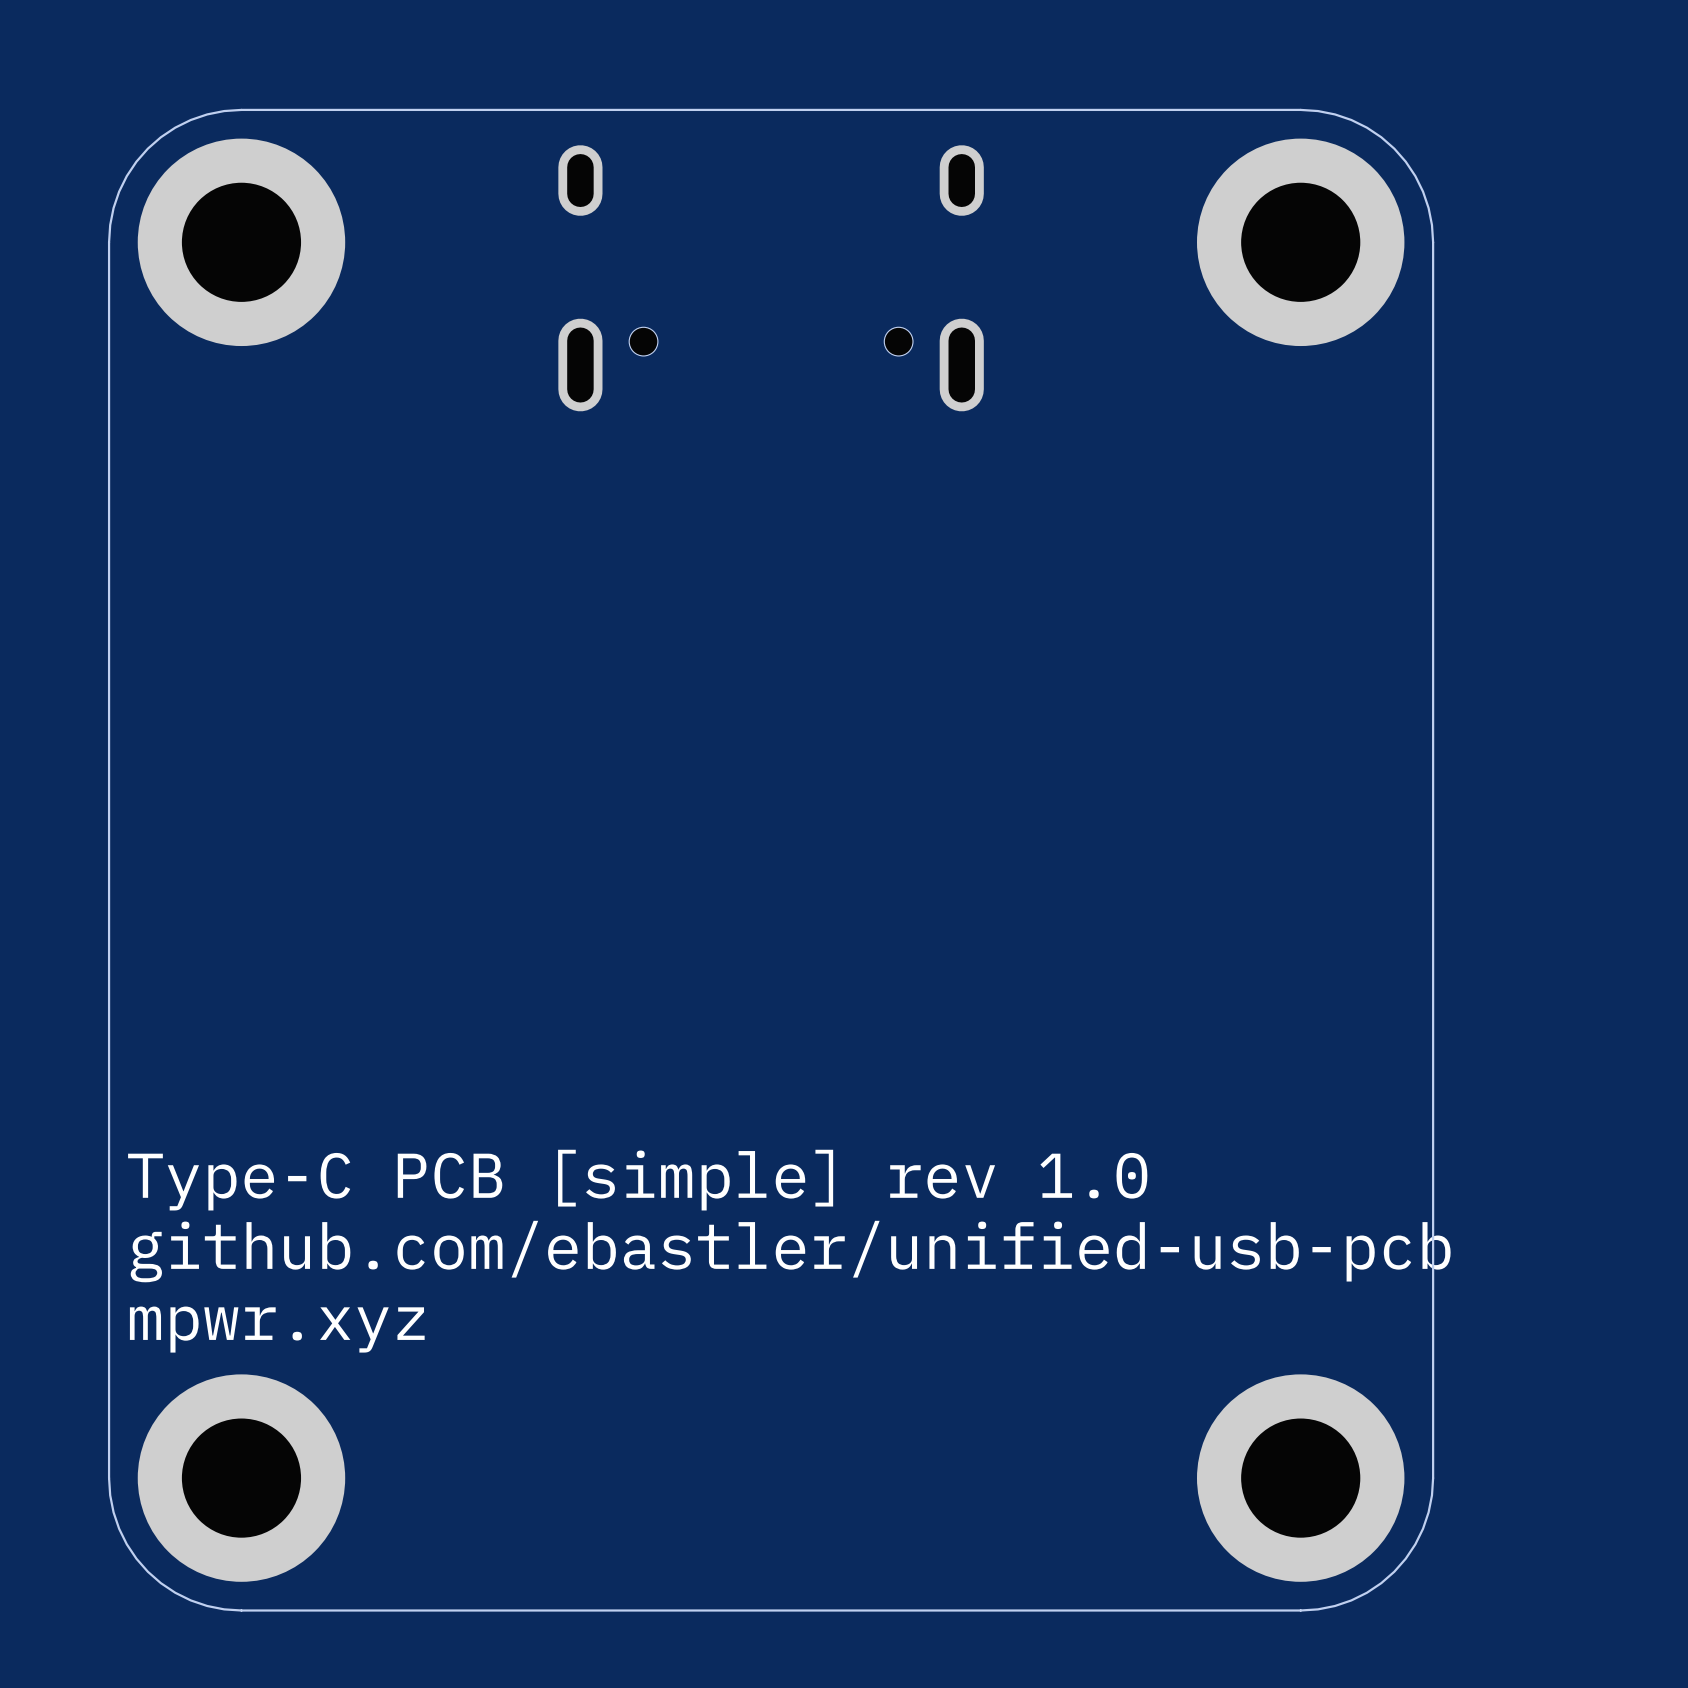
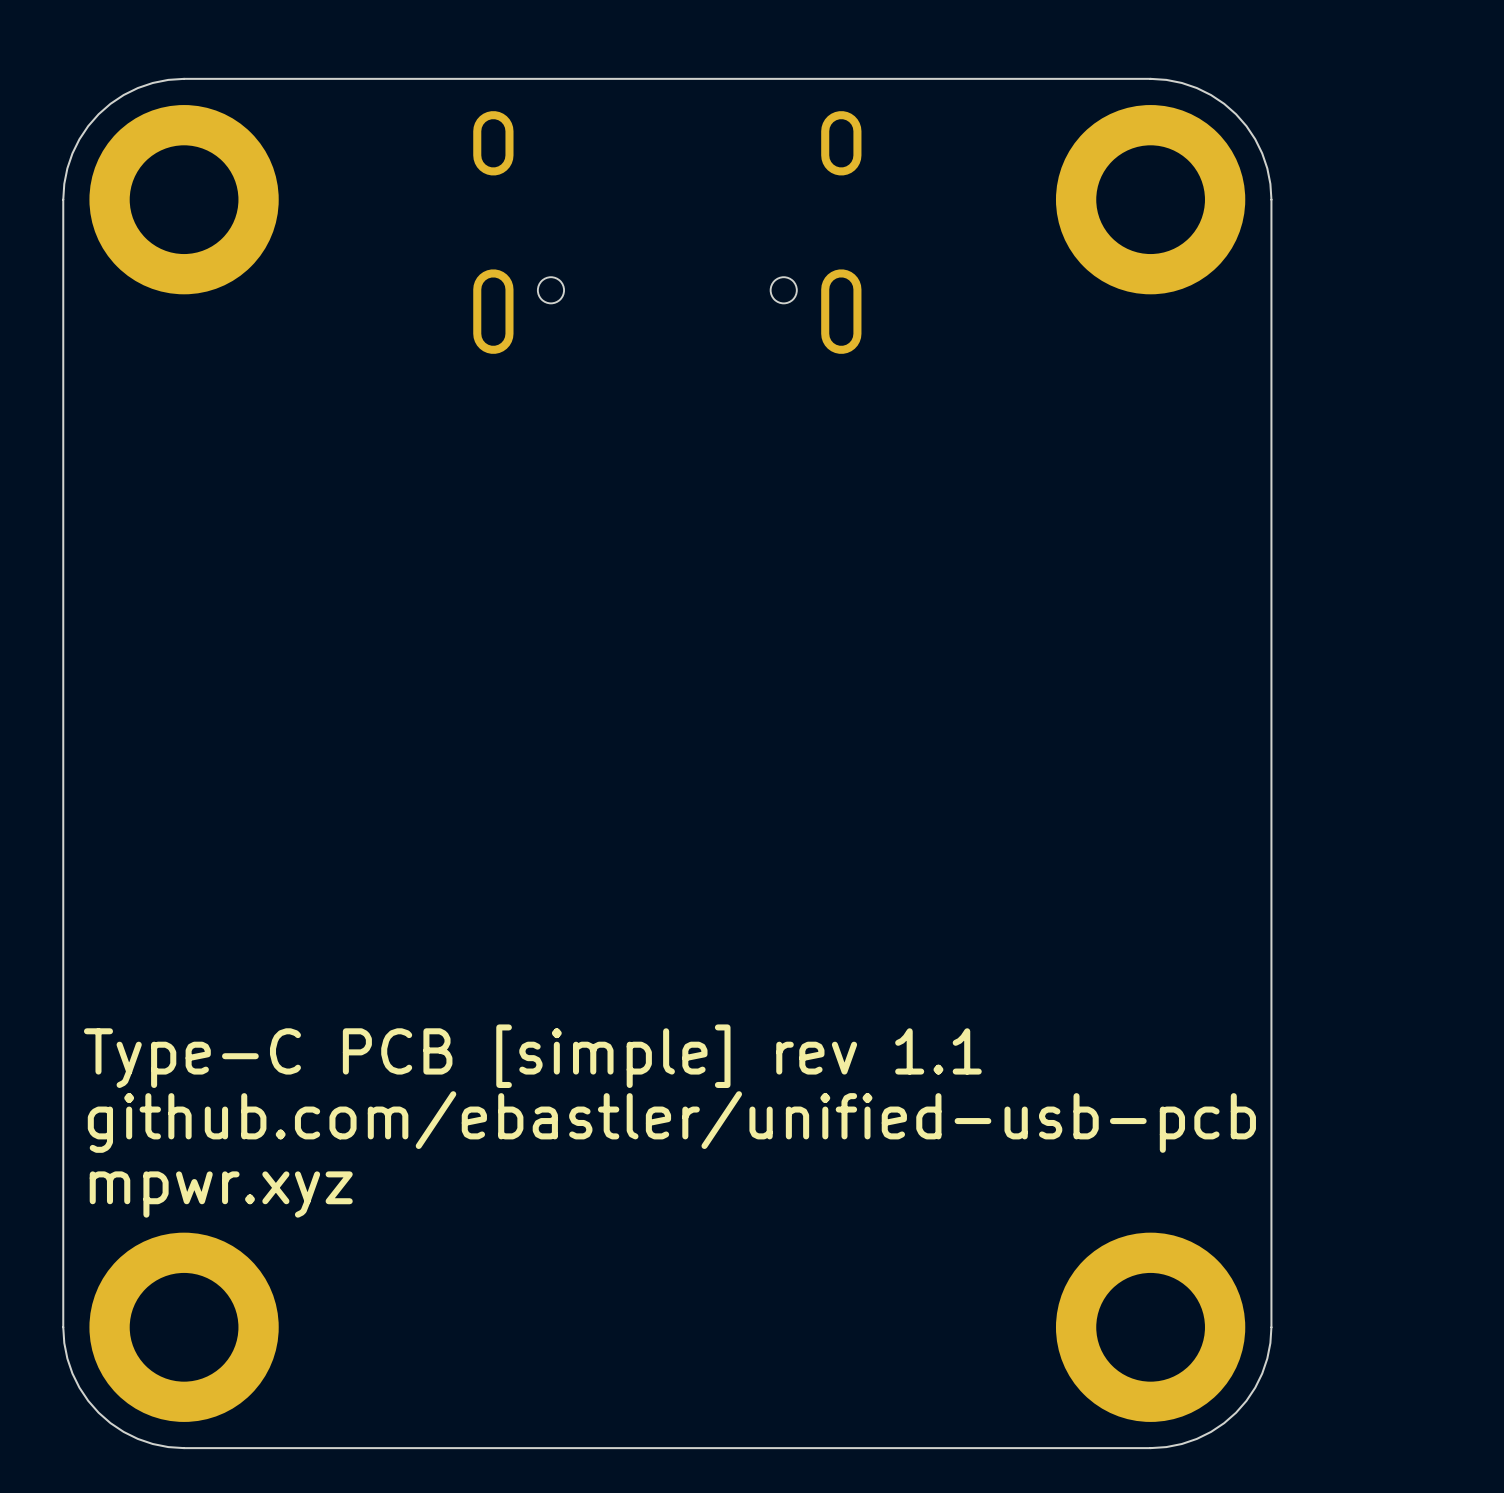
text: Type-C PCB [simple] rev 1.0 (637, 1180) -> Type-C PCB [simple] rev 1.1 (532, 1056)

